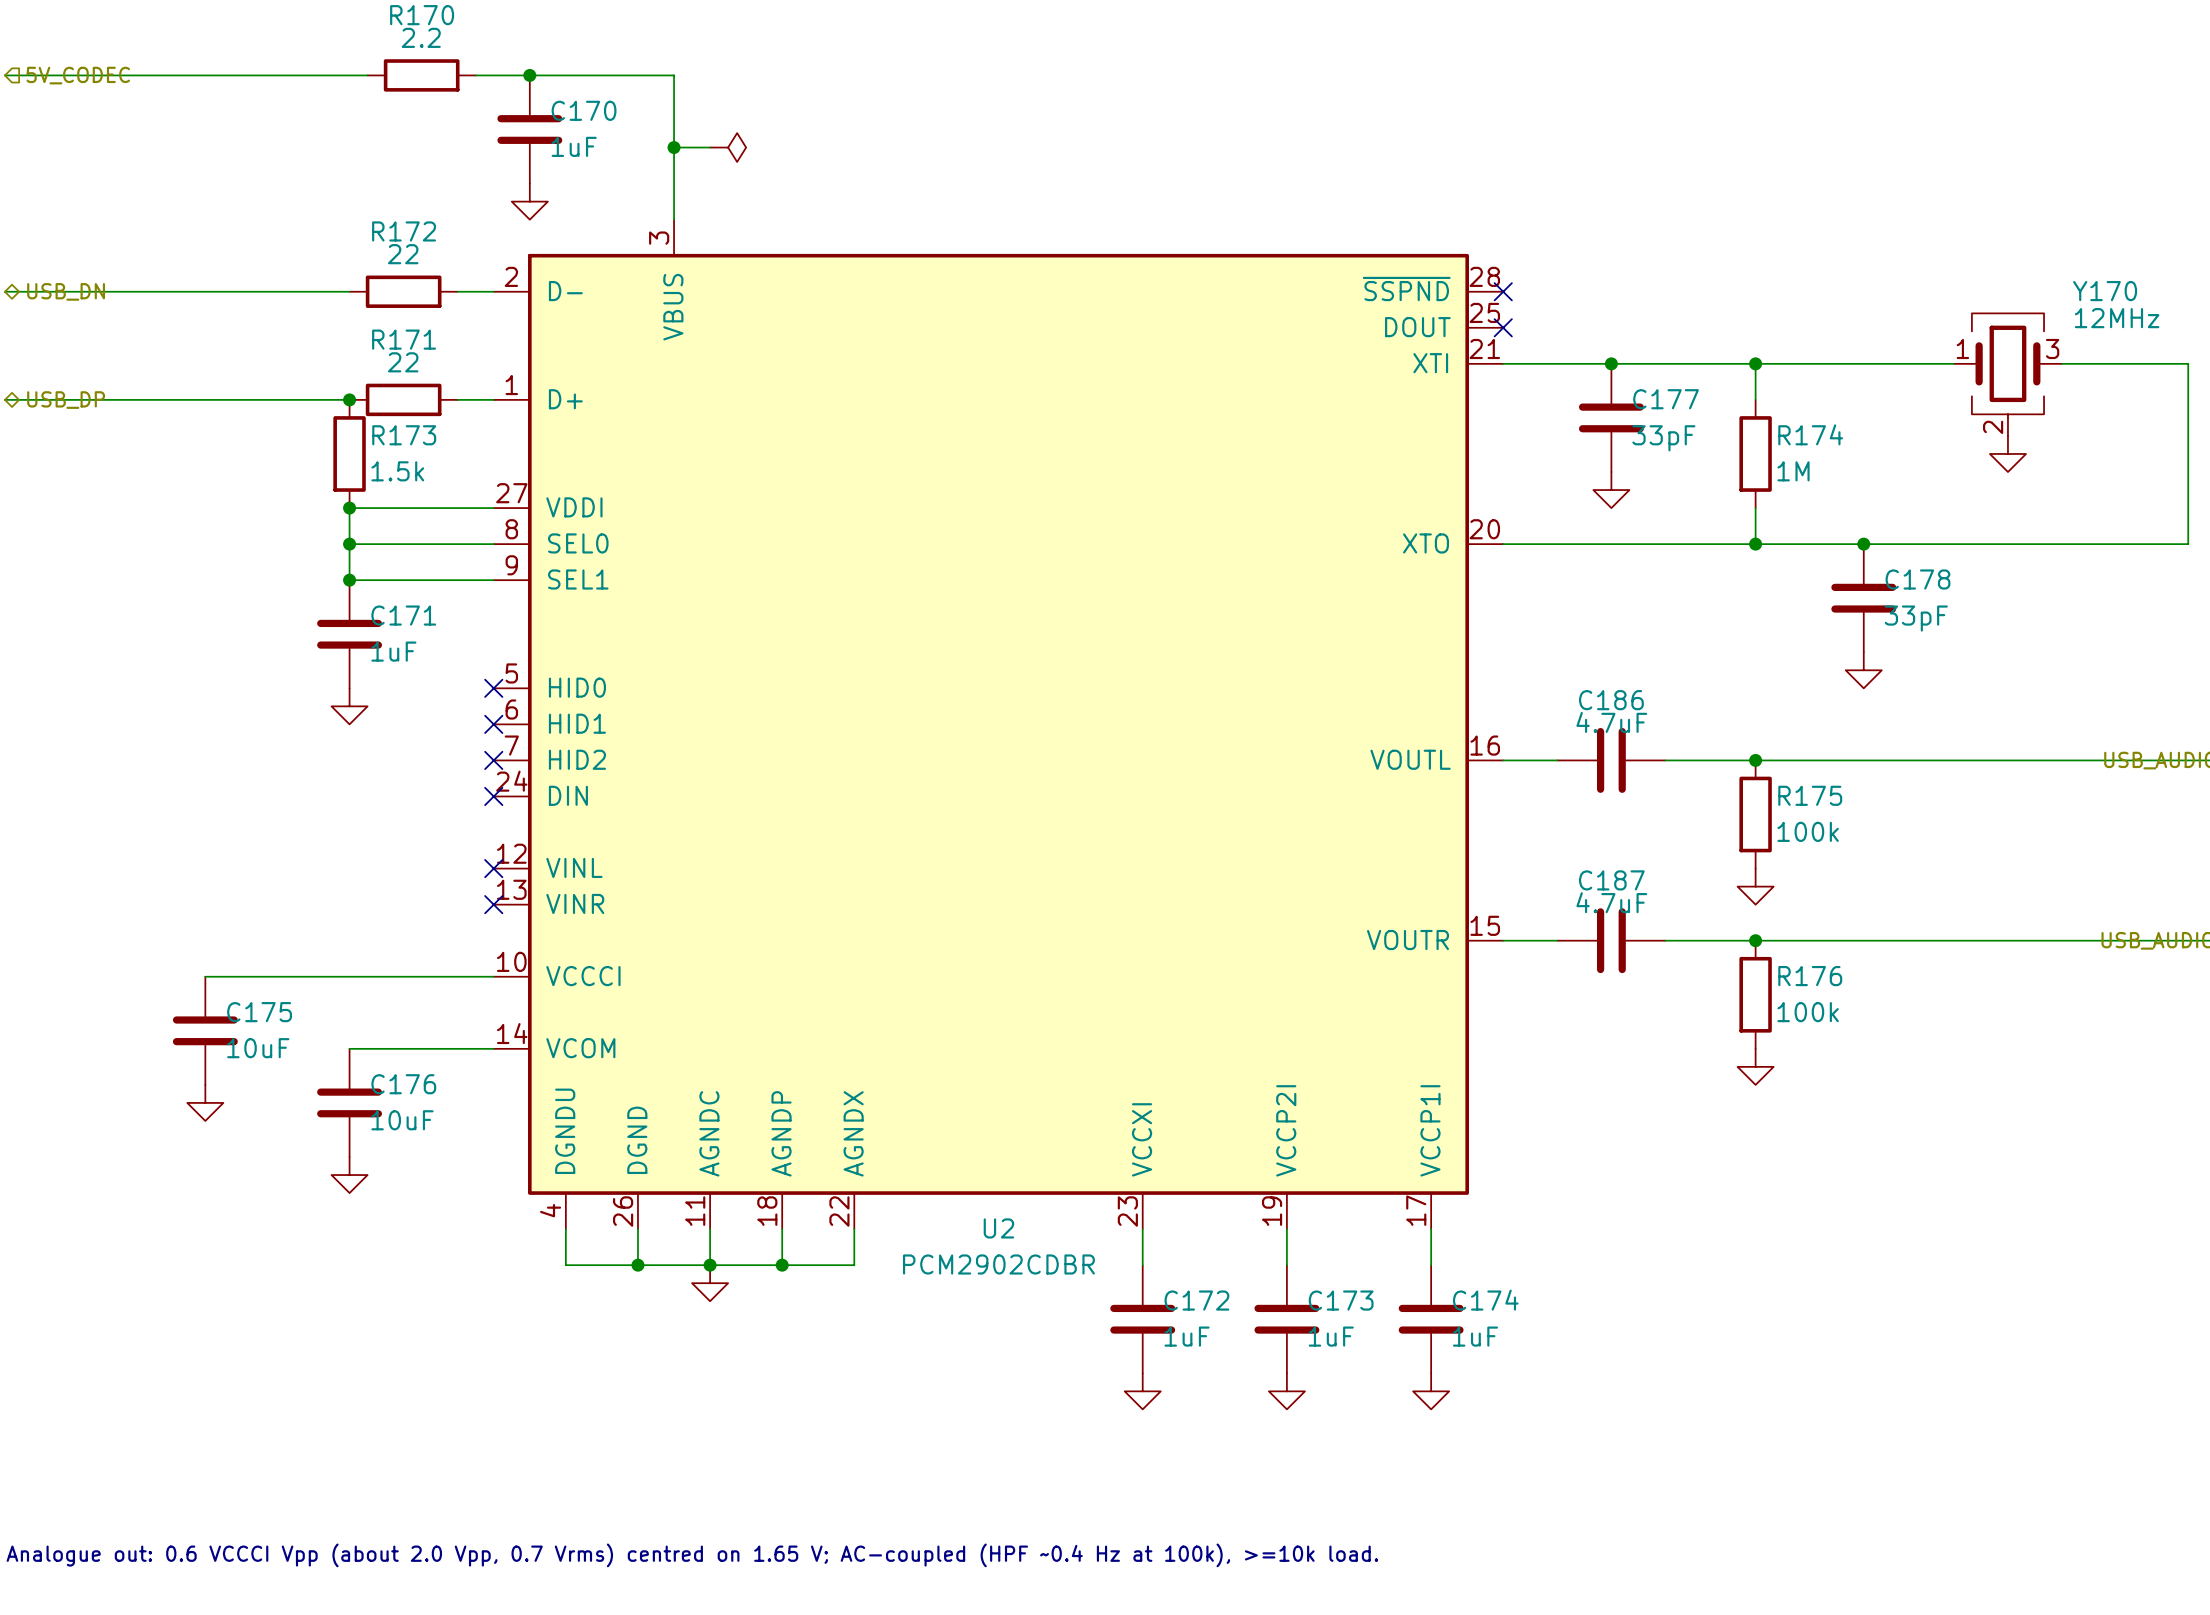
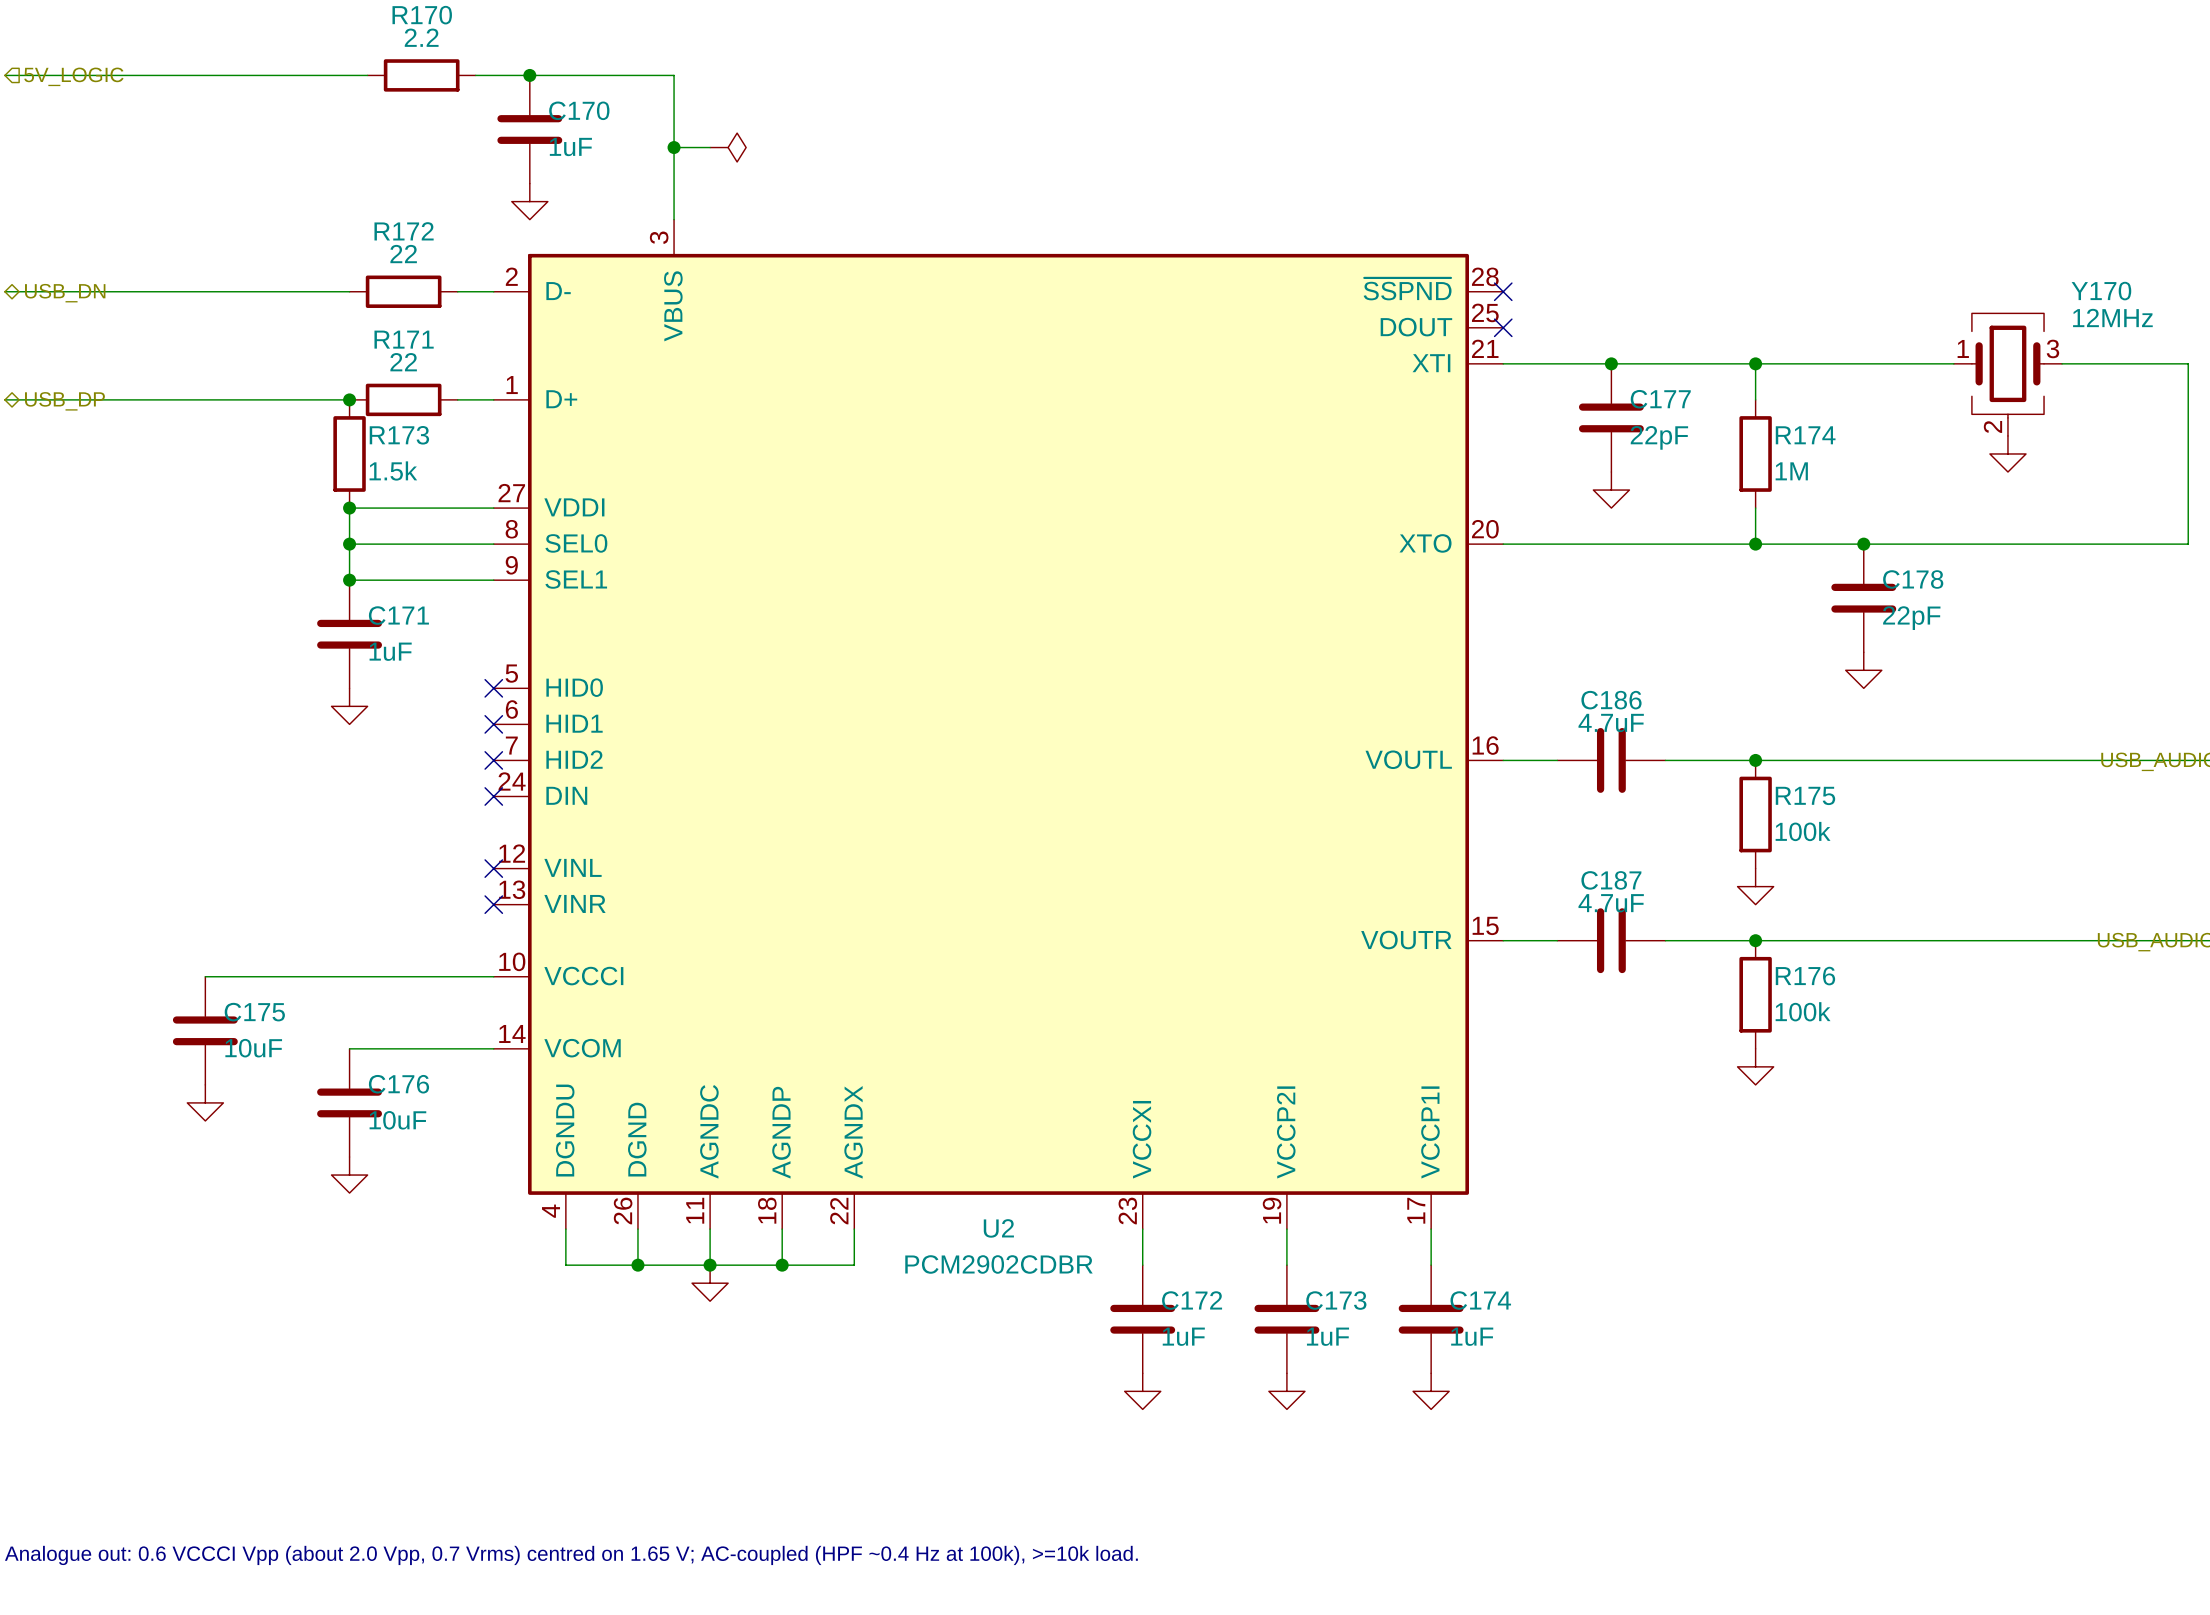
hierarchical label: 5V_CODEC (78, 75) -> 5V_LOGIC (73, 76)
C177 value: 33pF (1663, 438) -> 22pF (1659, 437)
C178 value: 33pF (1916, 618) -> 22pF (1911, 618)

